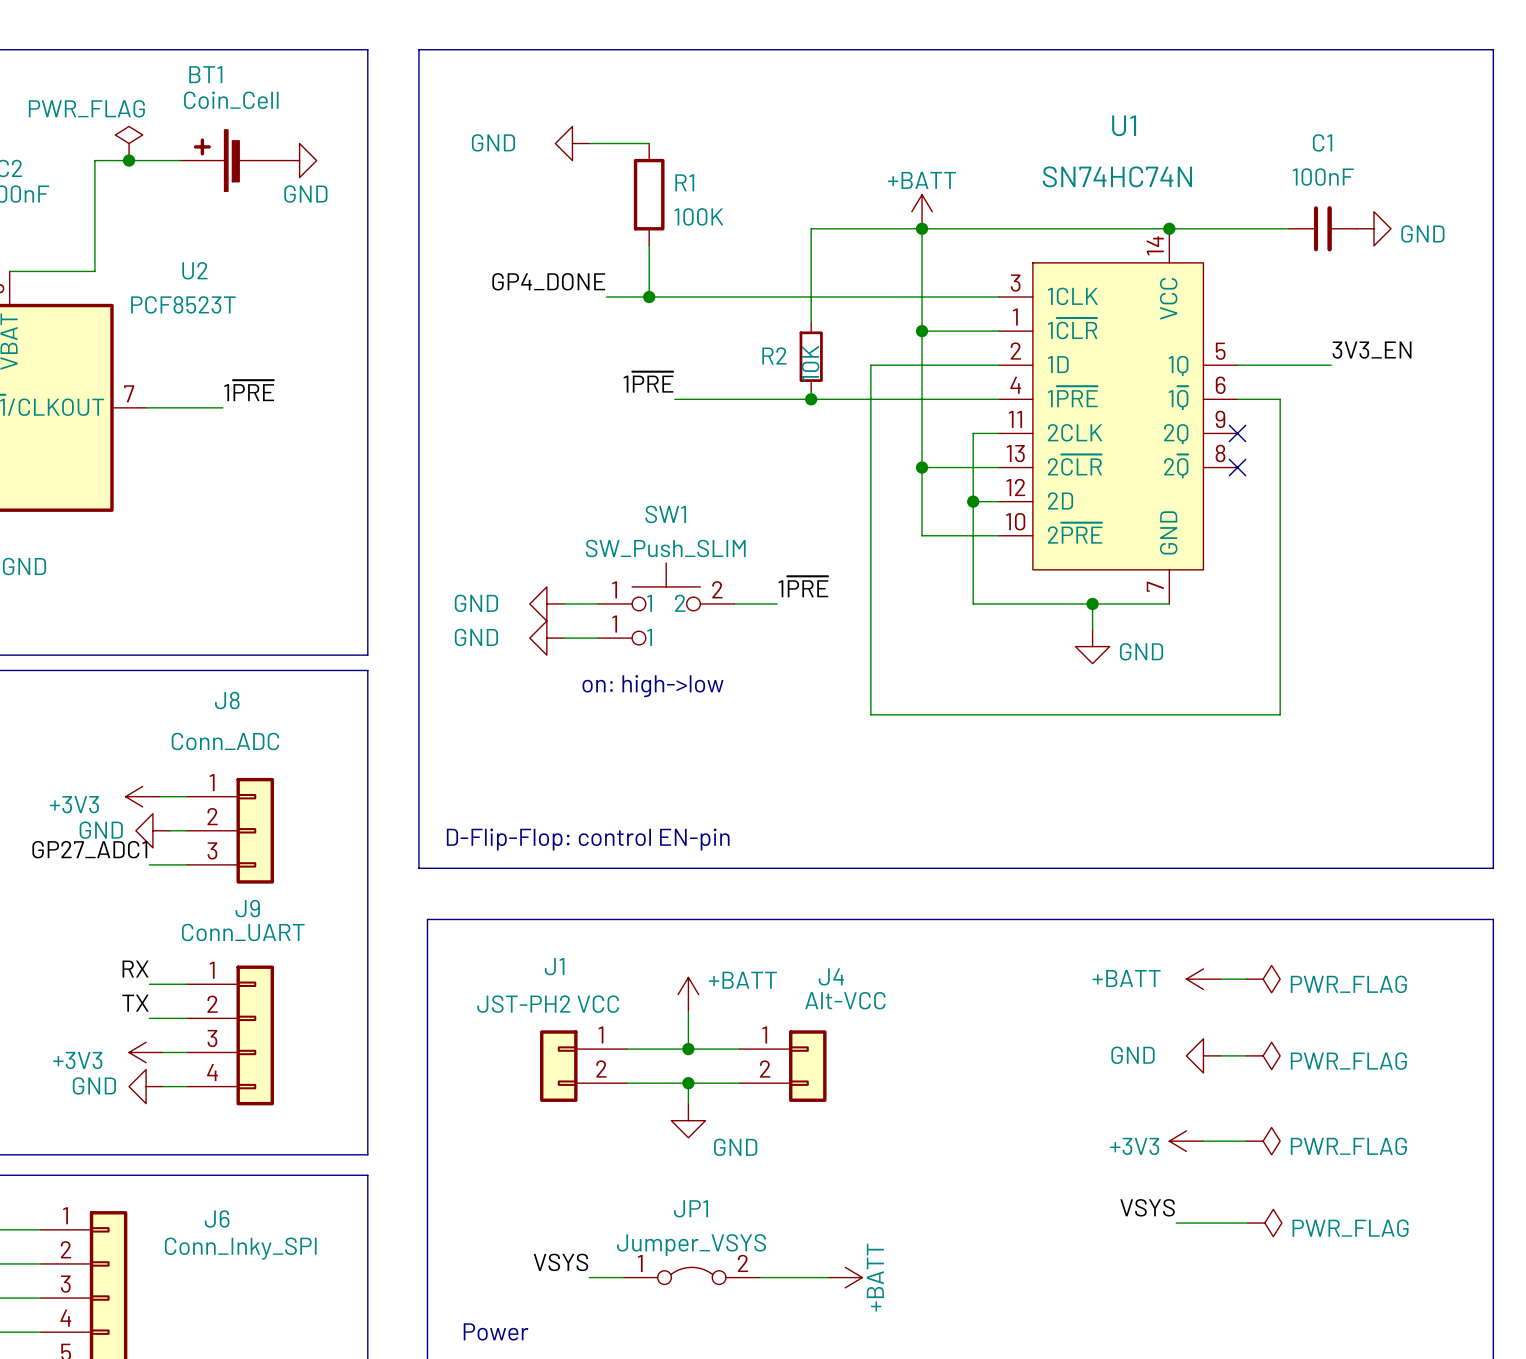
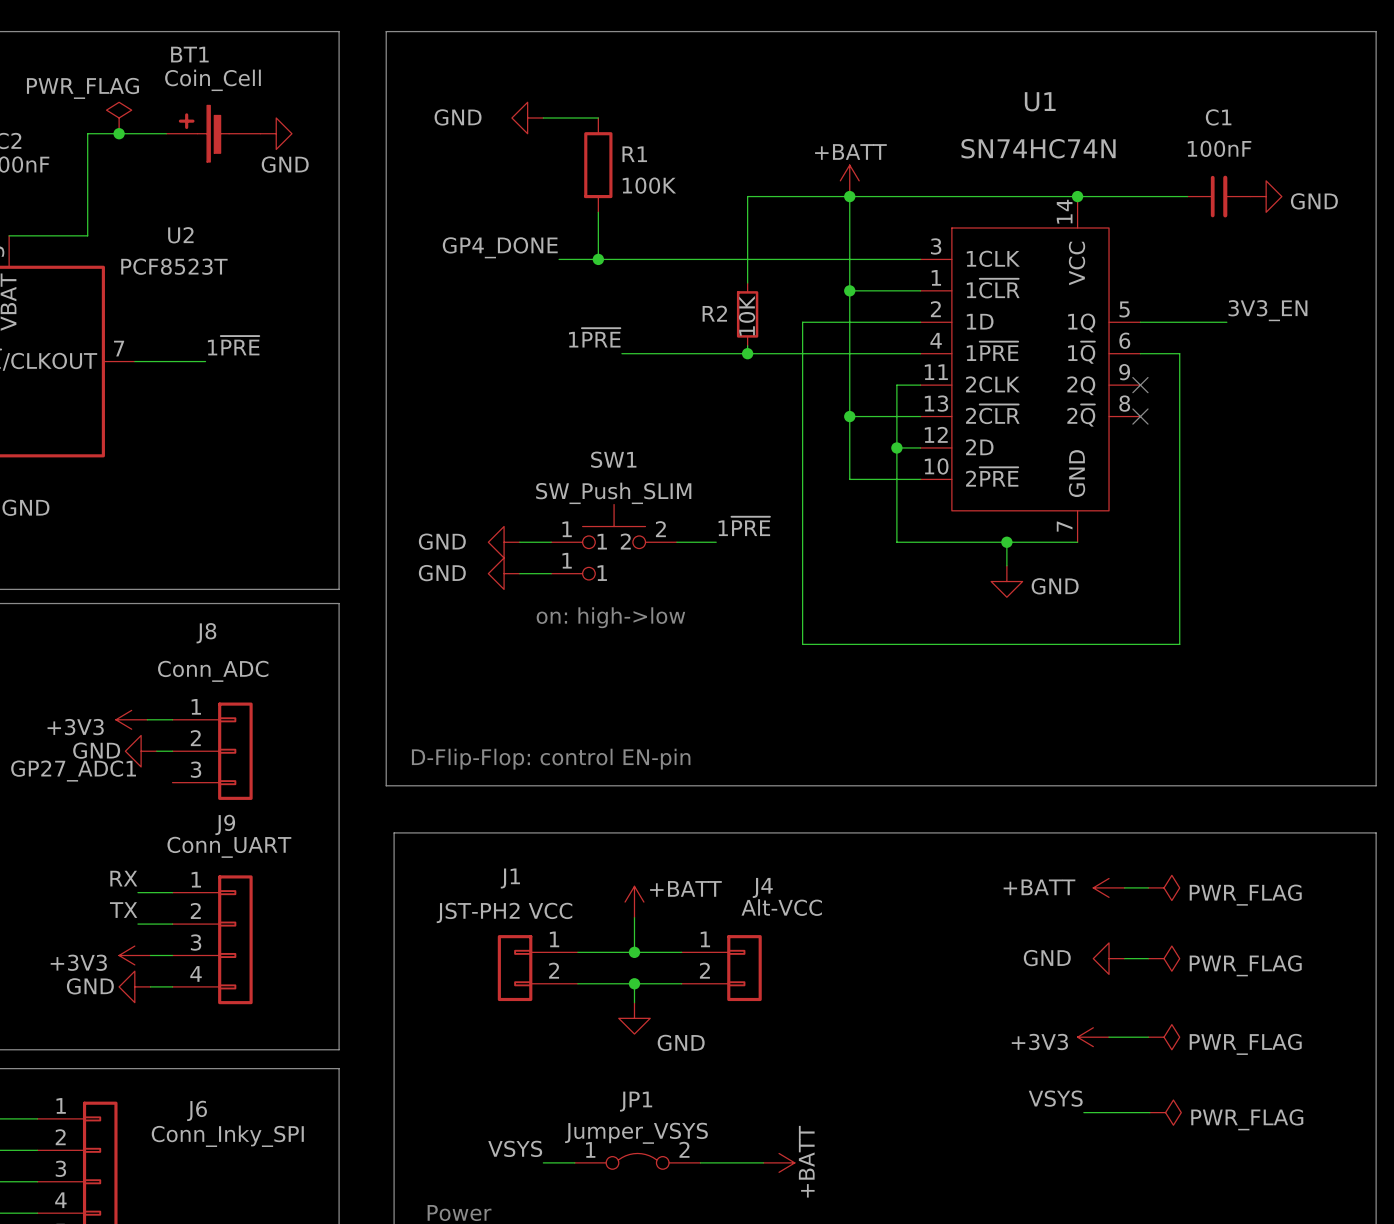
wire: (149, 864) (187, 864) -> none

